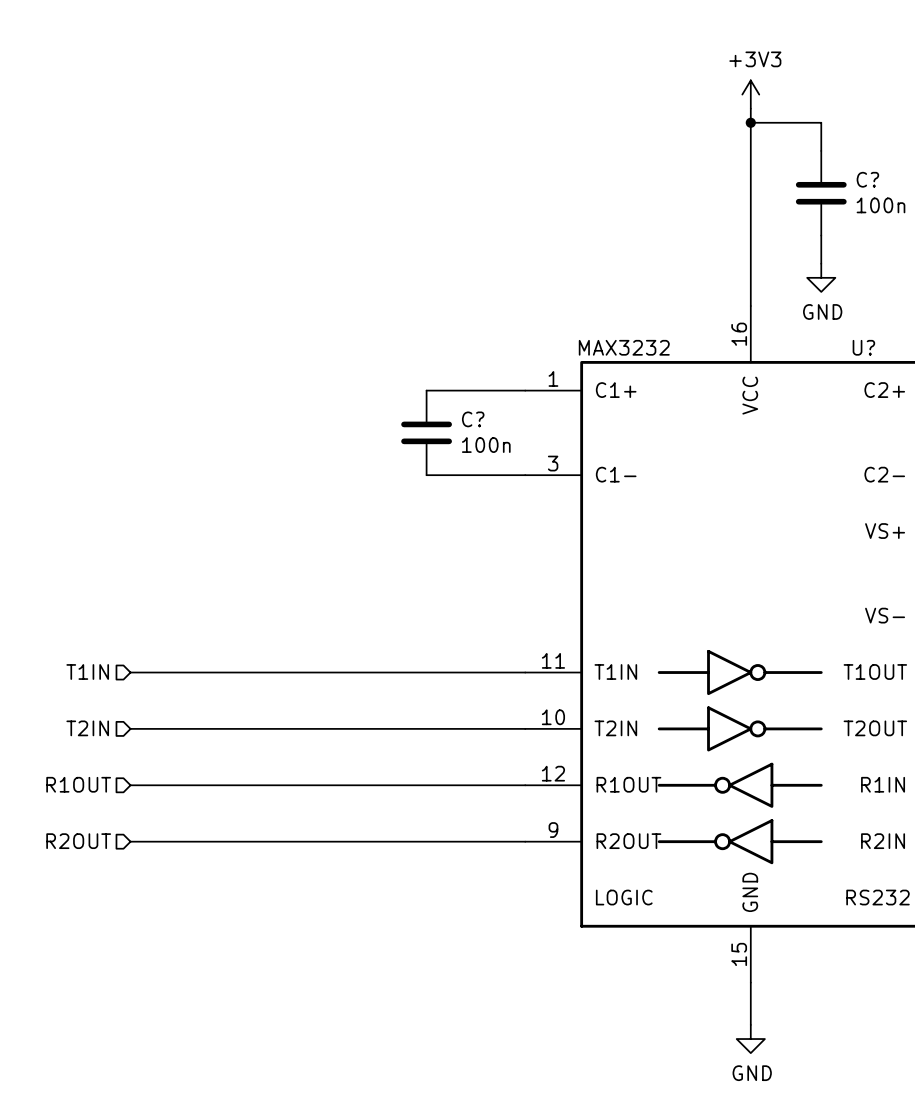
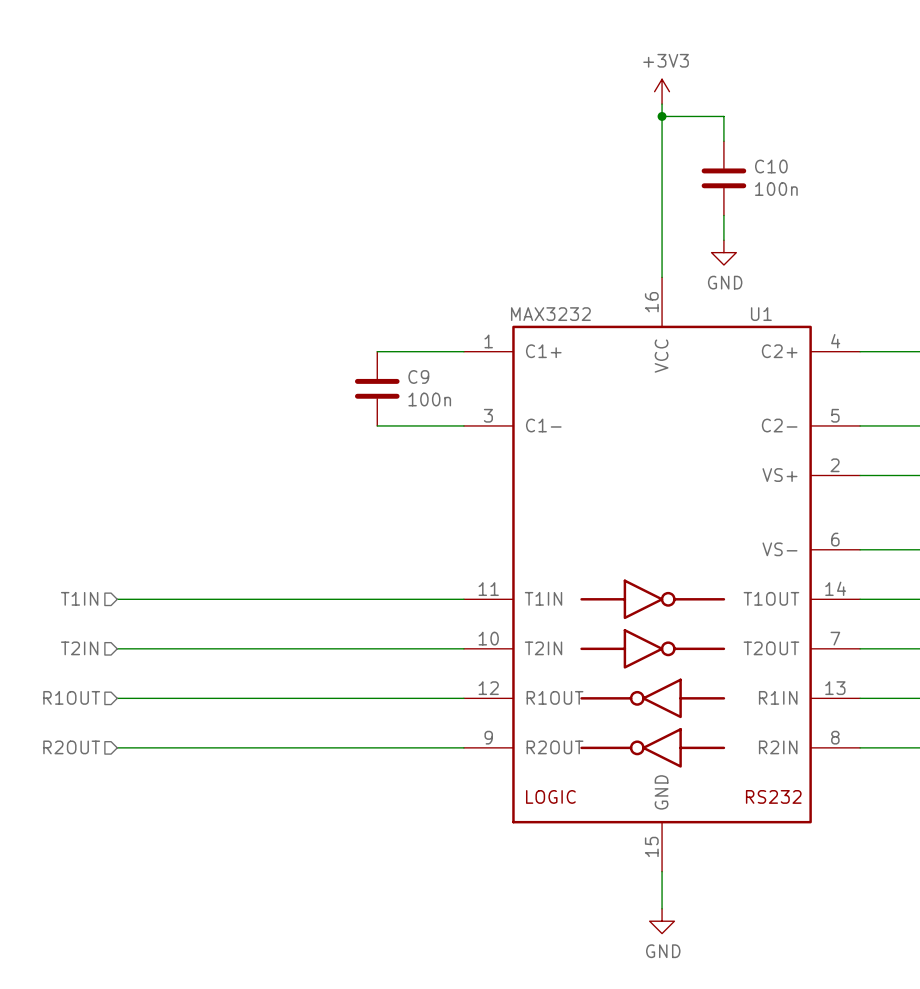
C? name: C? (867, 179) -> C10 (771, 166)
U? name: U? (863, 347) -> U1 (761, 314)
C? name: C? (473, 419) -> C9 (418, 376)

